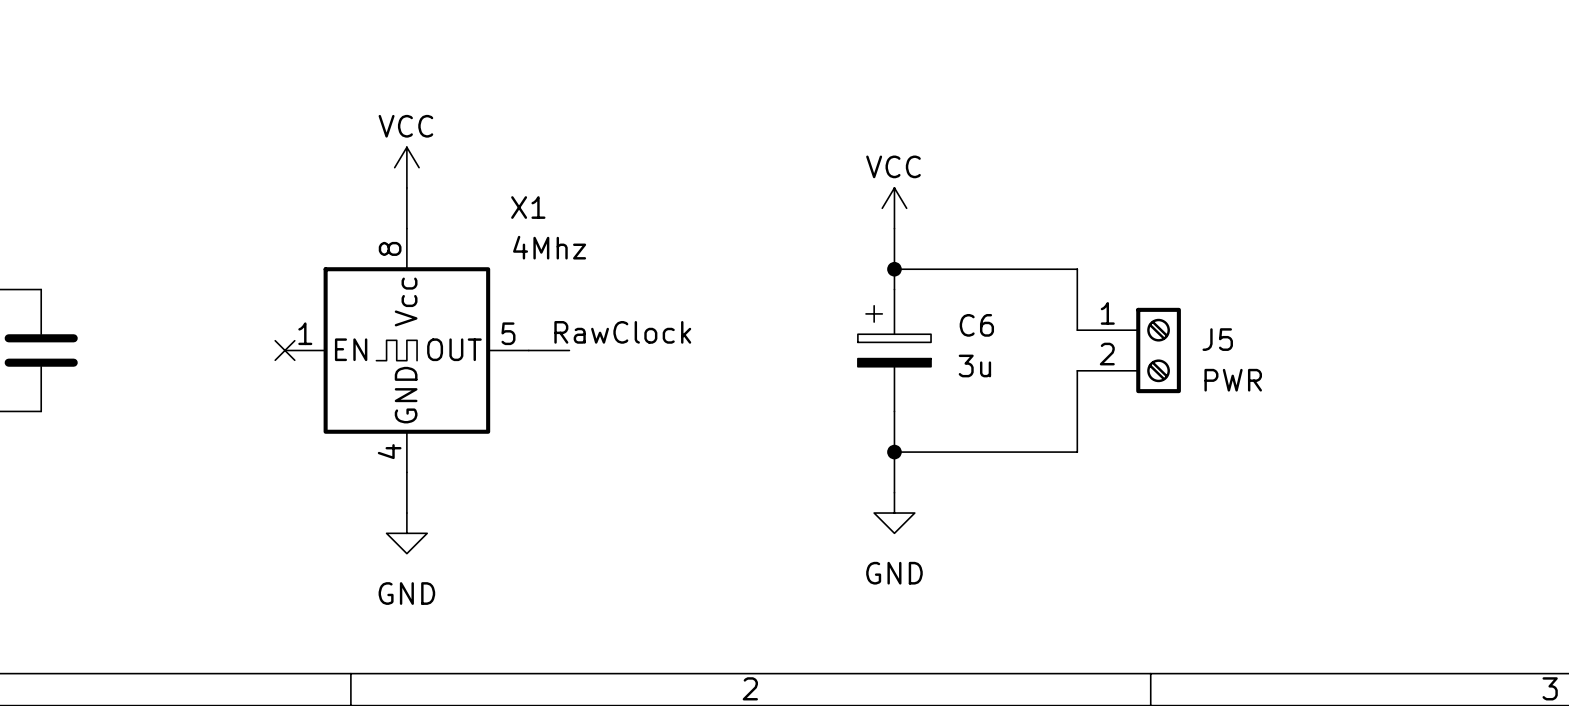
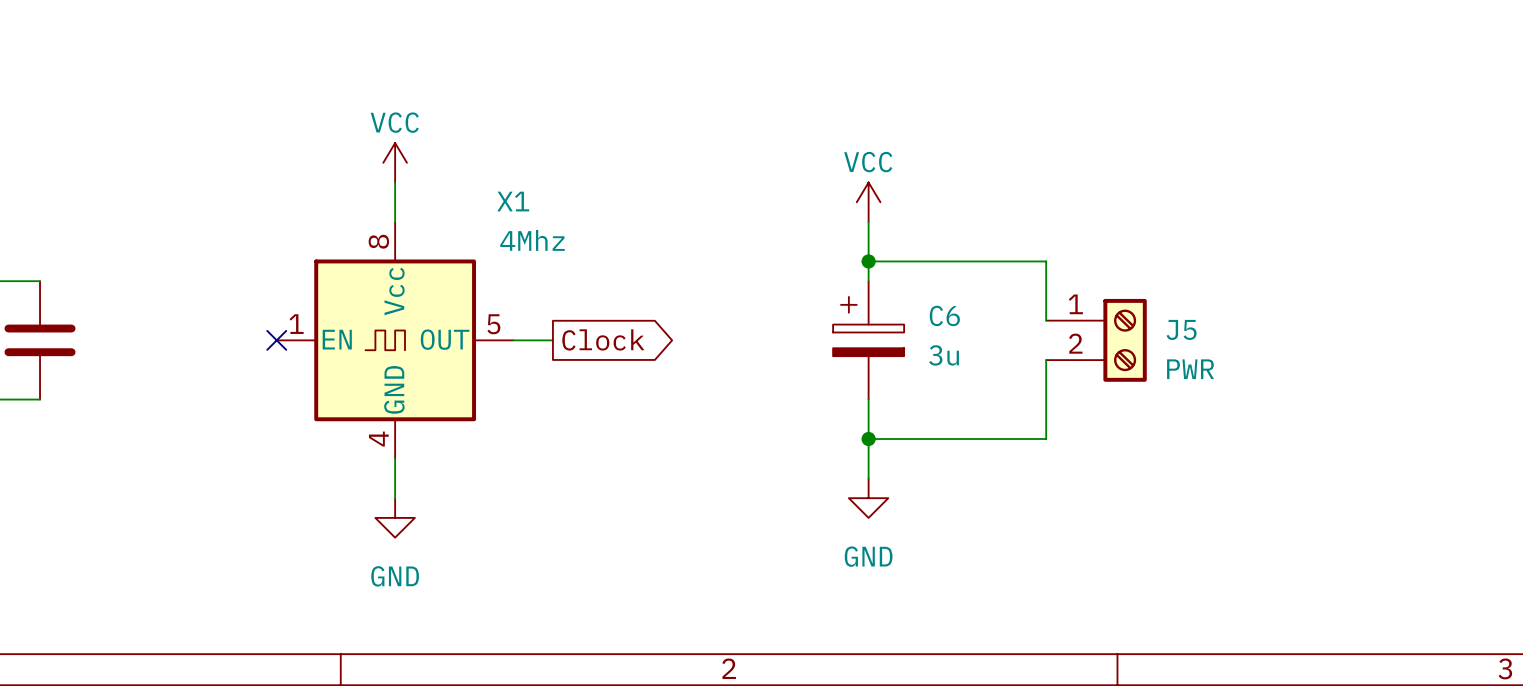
label: RawClock (622, 332) -> none
global label: none -> Clock (603, 339)

